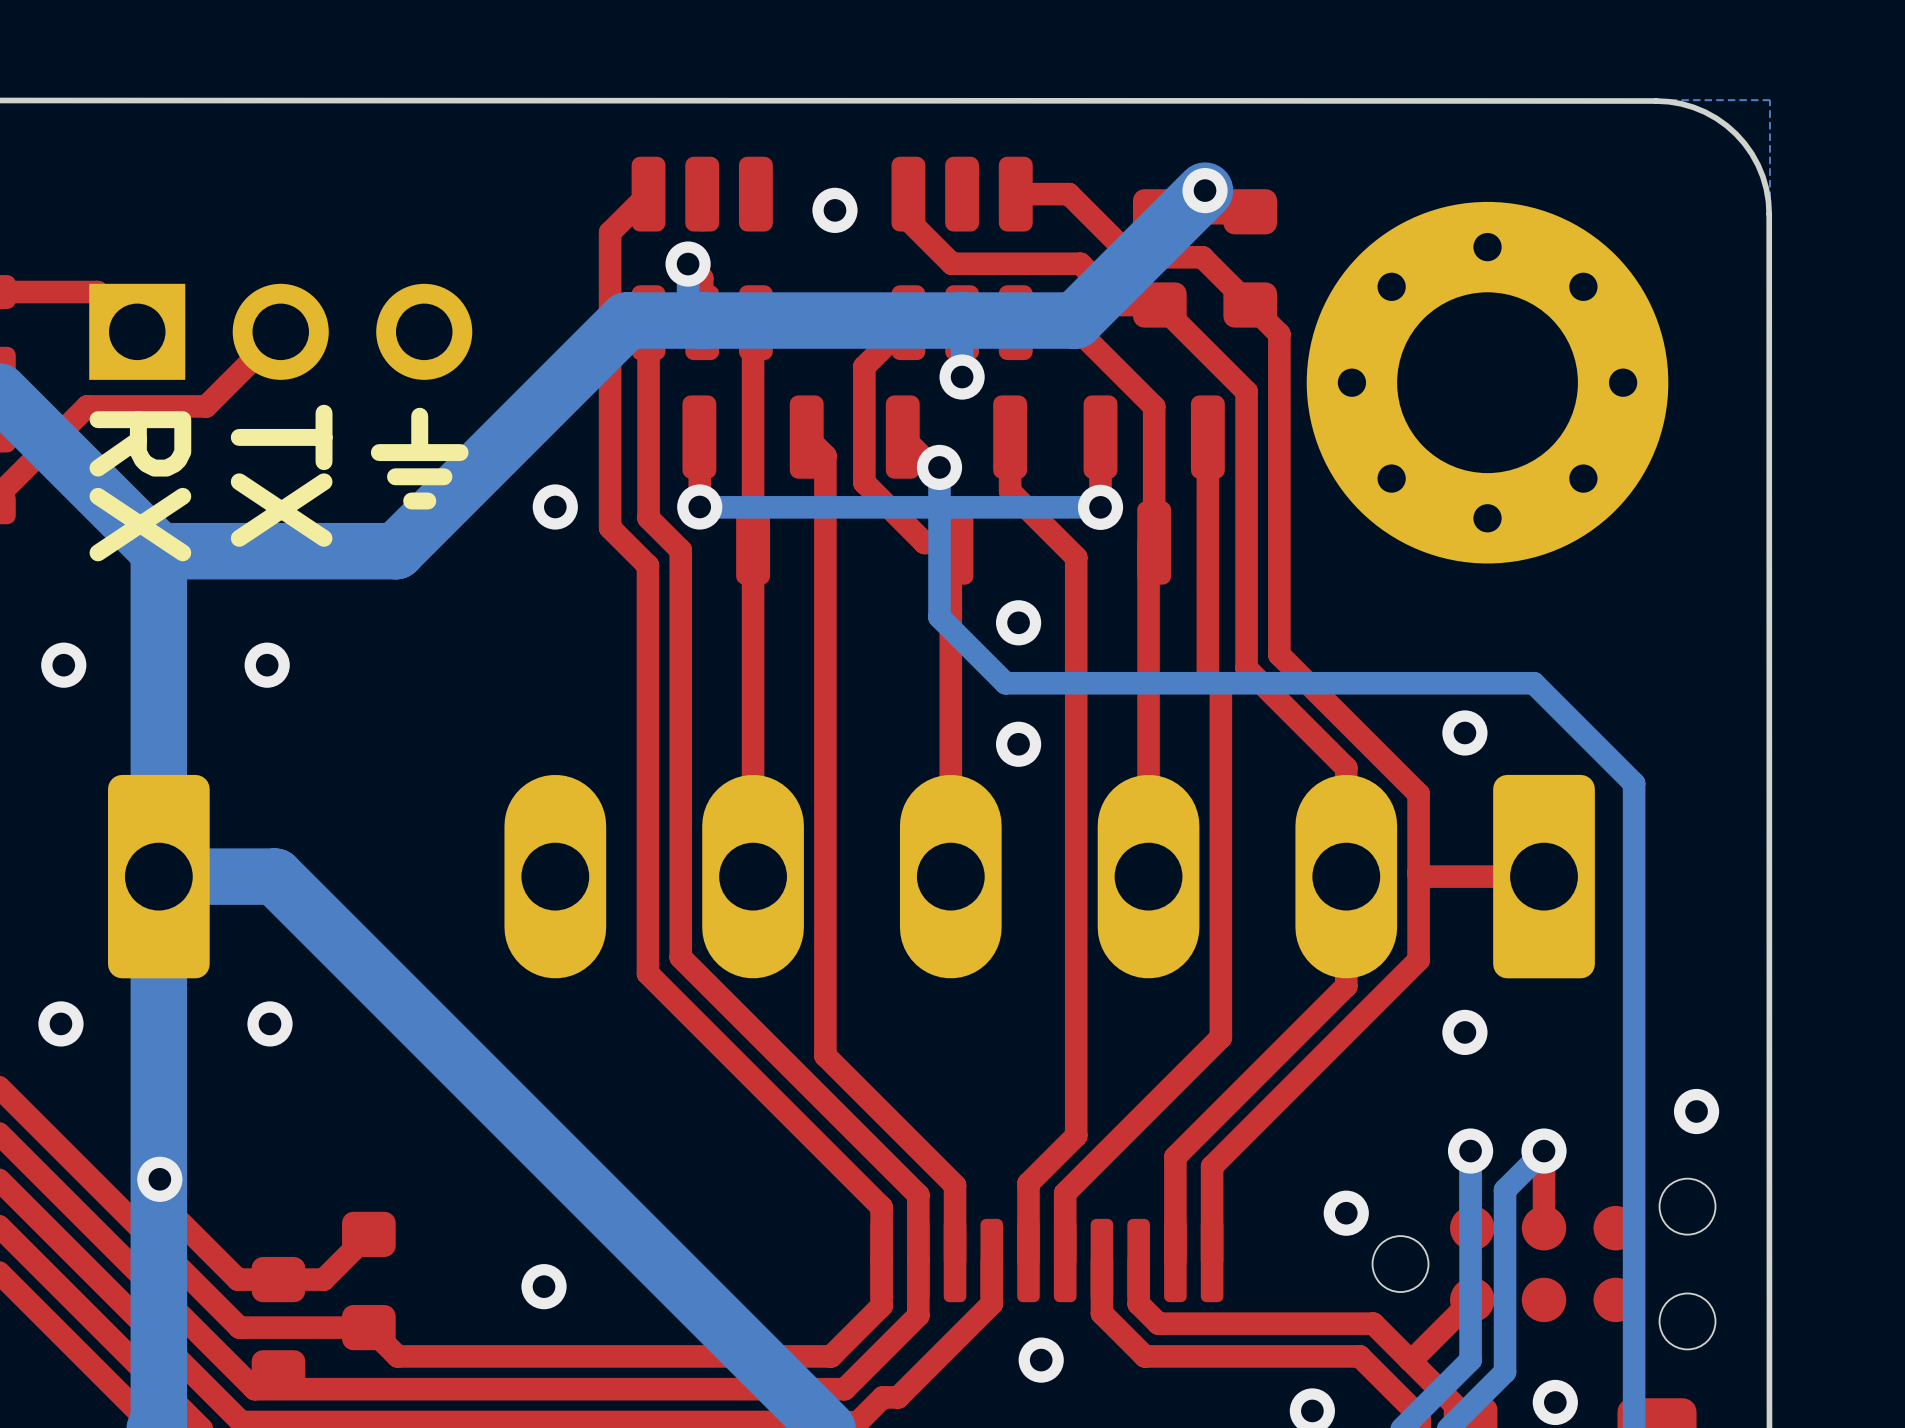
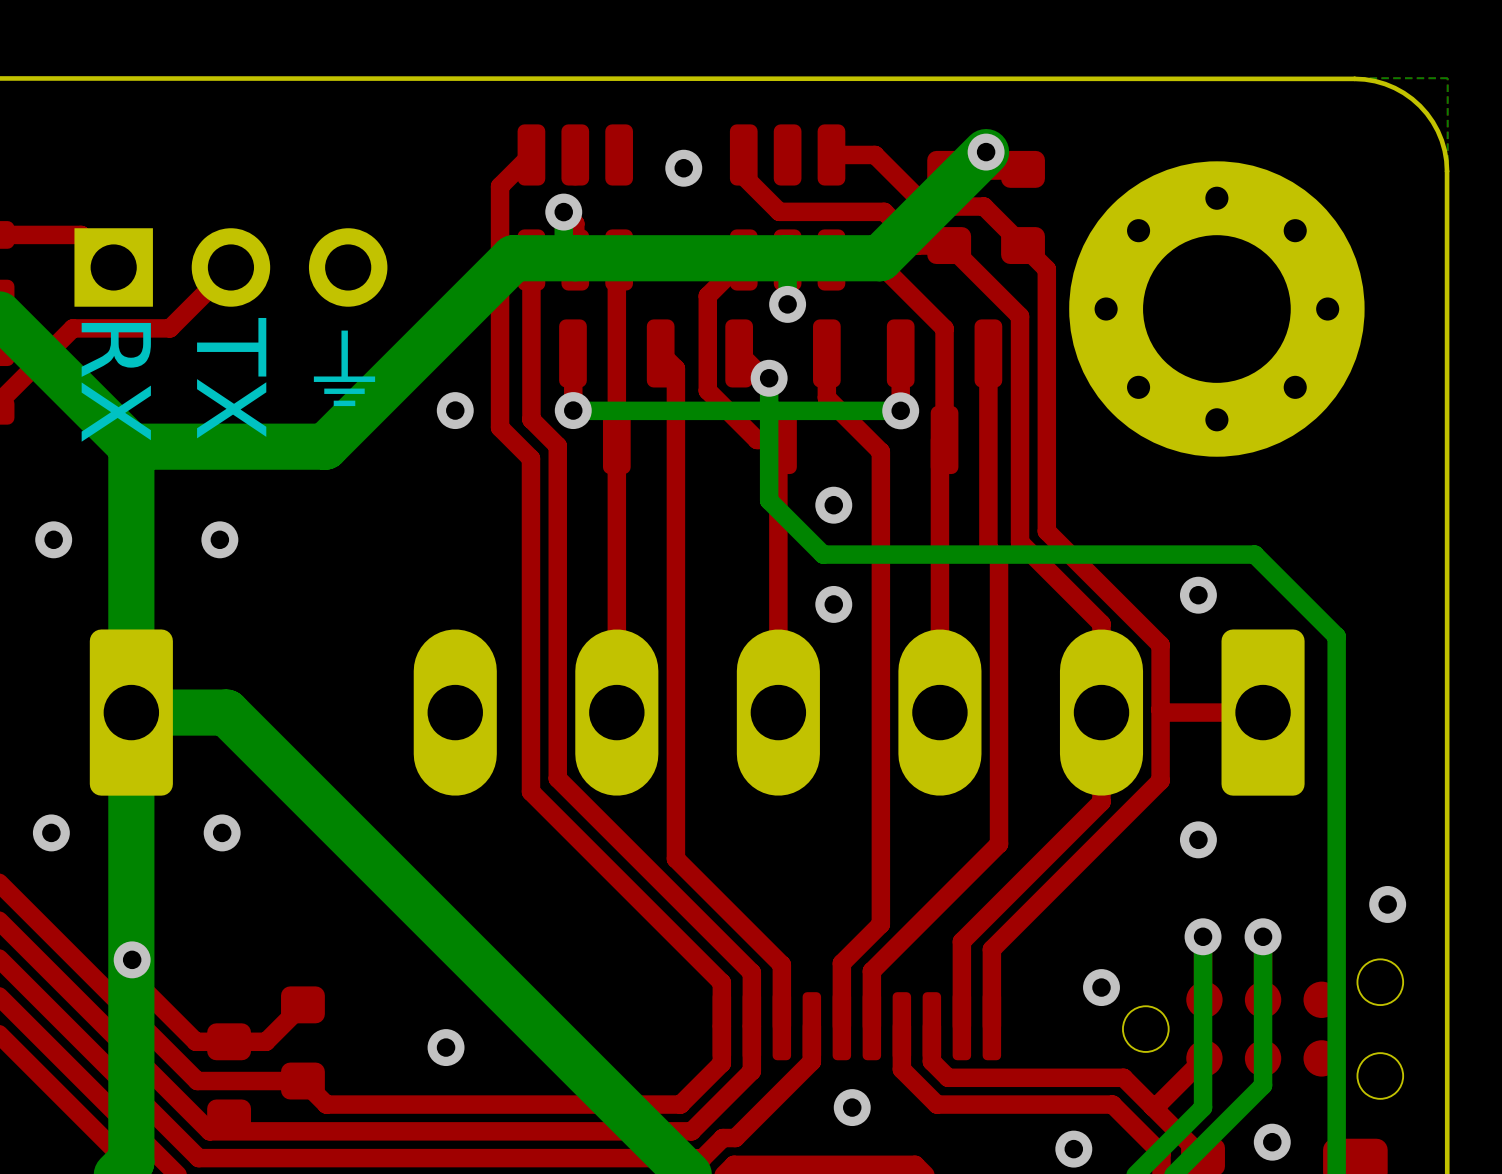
bottom track: (1544, 1151) (1505, 1190) (1505, 1371) -> (1263, 936) (1263, 1085) (1231, 1117)

